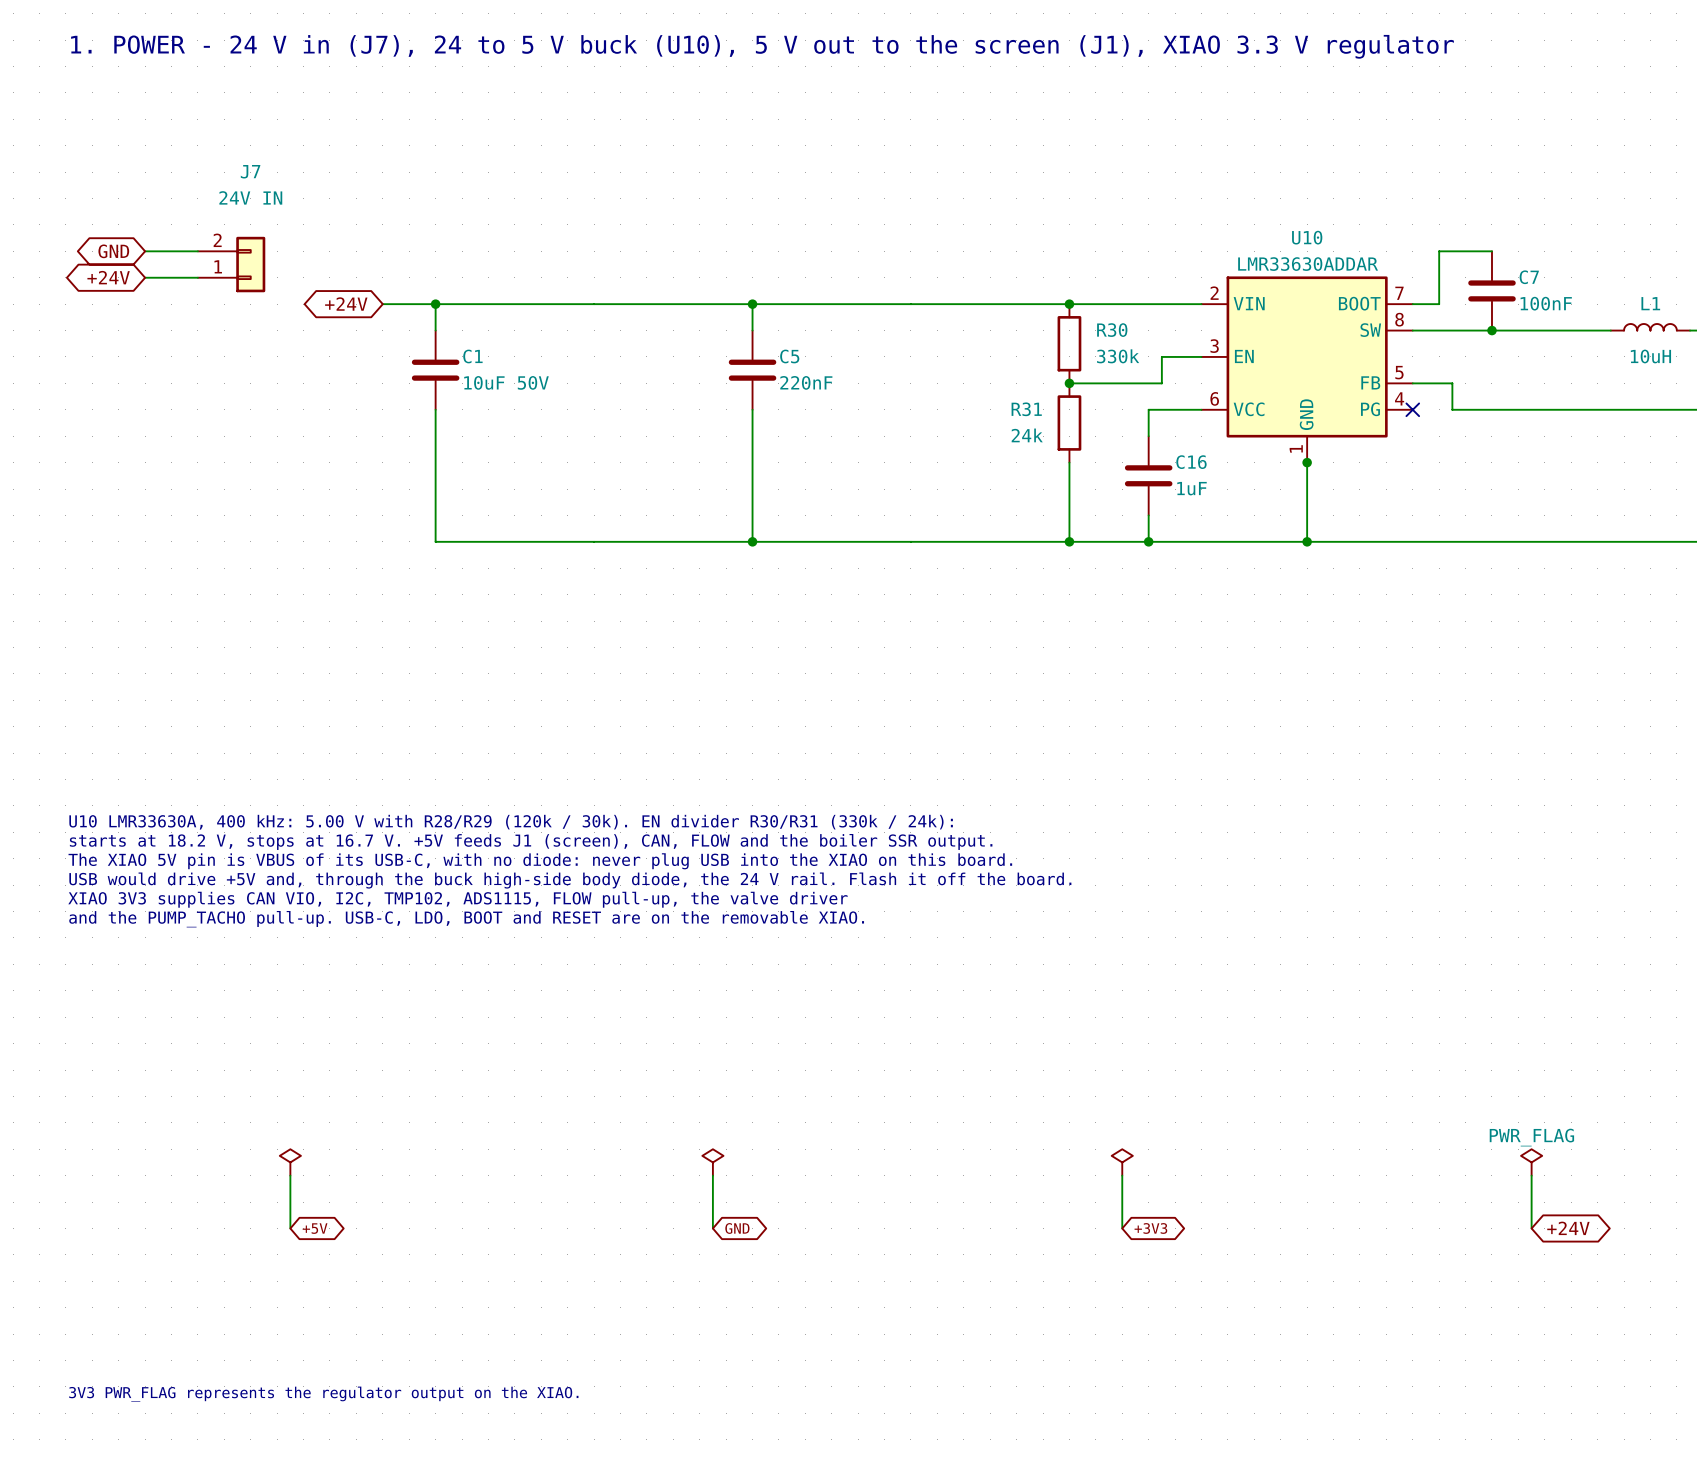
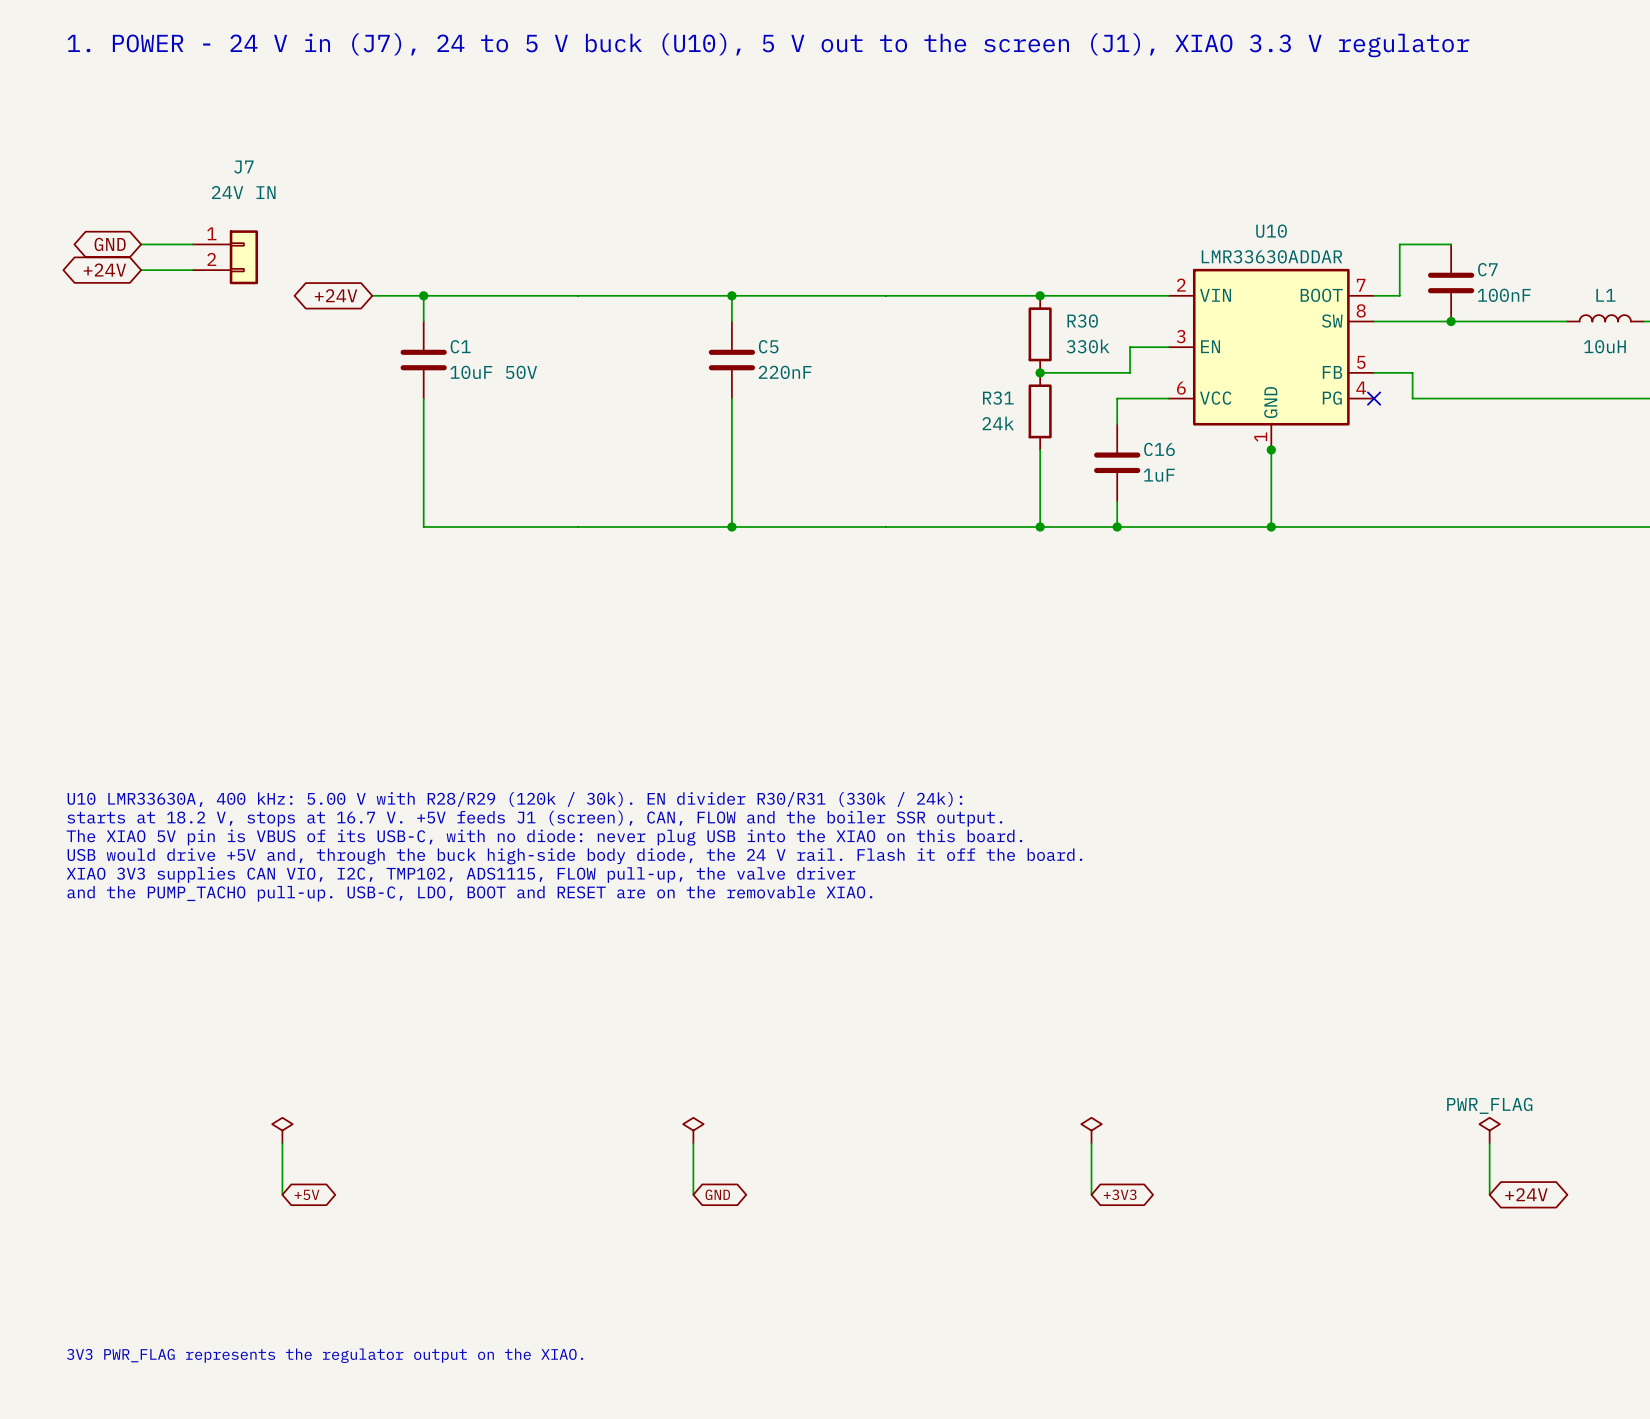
J7 flip: as is (250, 264) -> up-down (243, 257)

